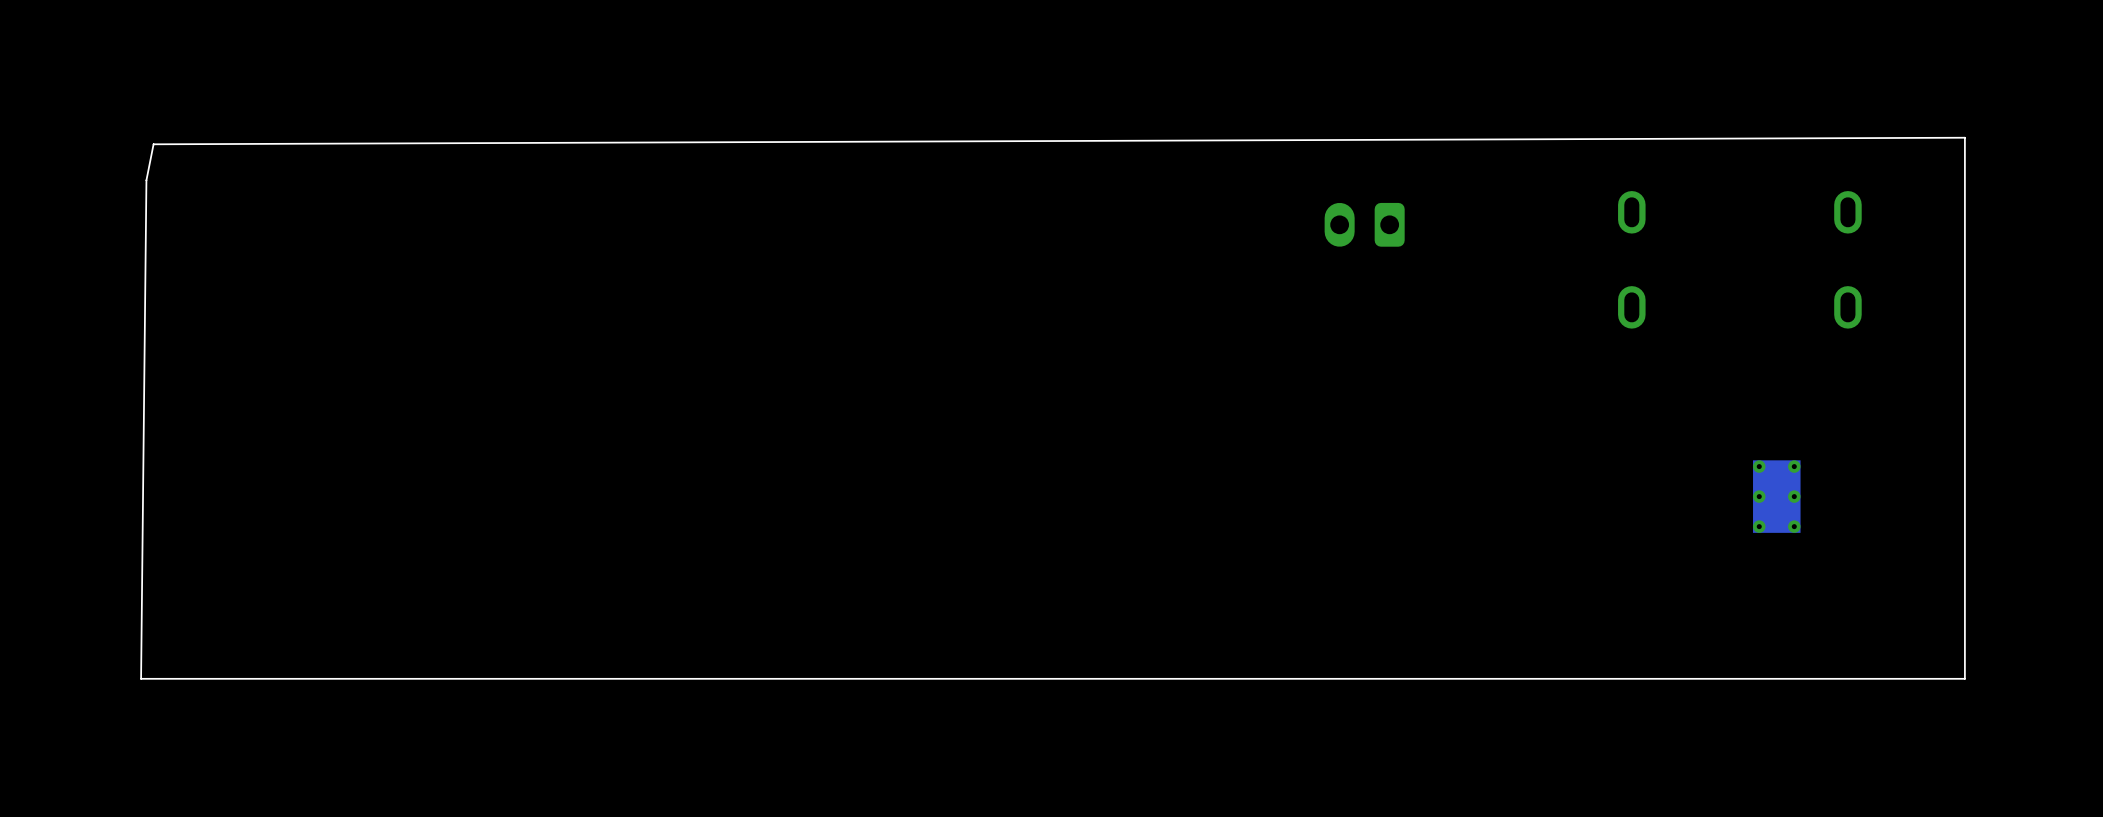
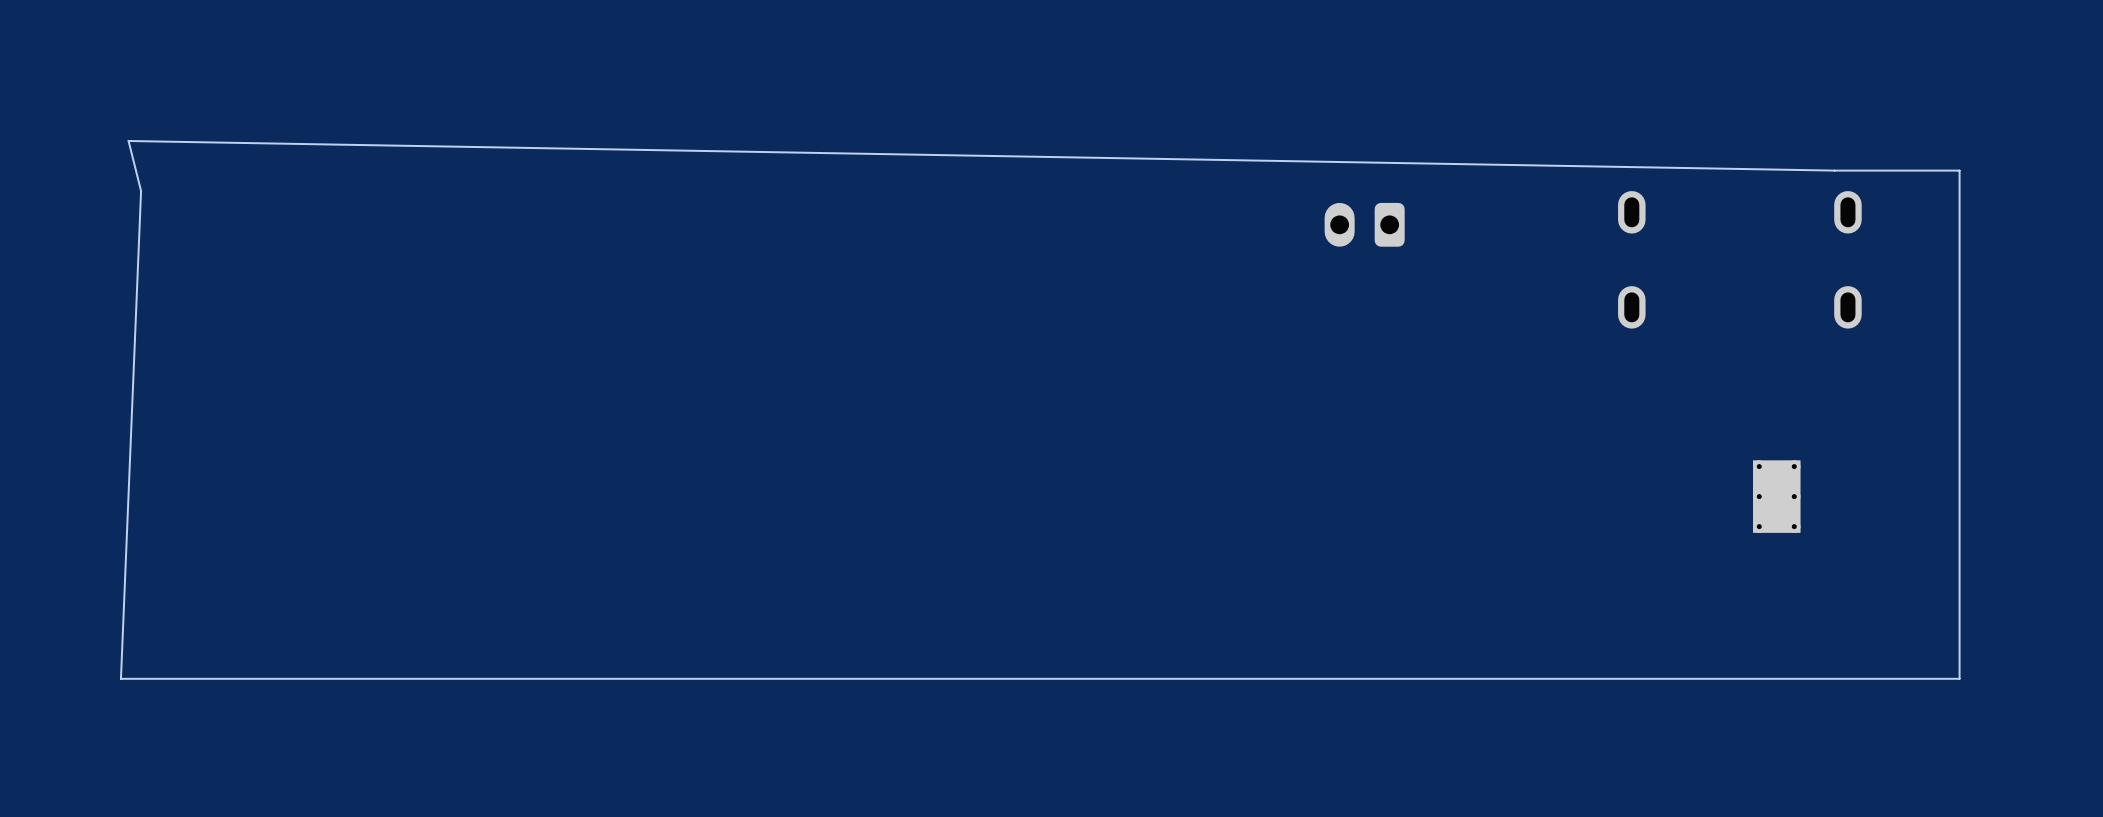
board edge: (1959, 678) (1964, 678) (1964, 137) (153, 144) (146, 180) (141, 678) -> (1959, 678) (1959, 170) (1834, 170) (128, 140) (141, 191) (120, 678) (141, 678)

